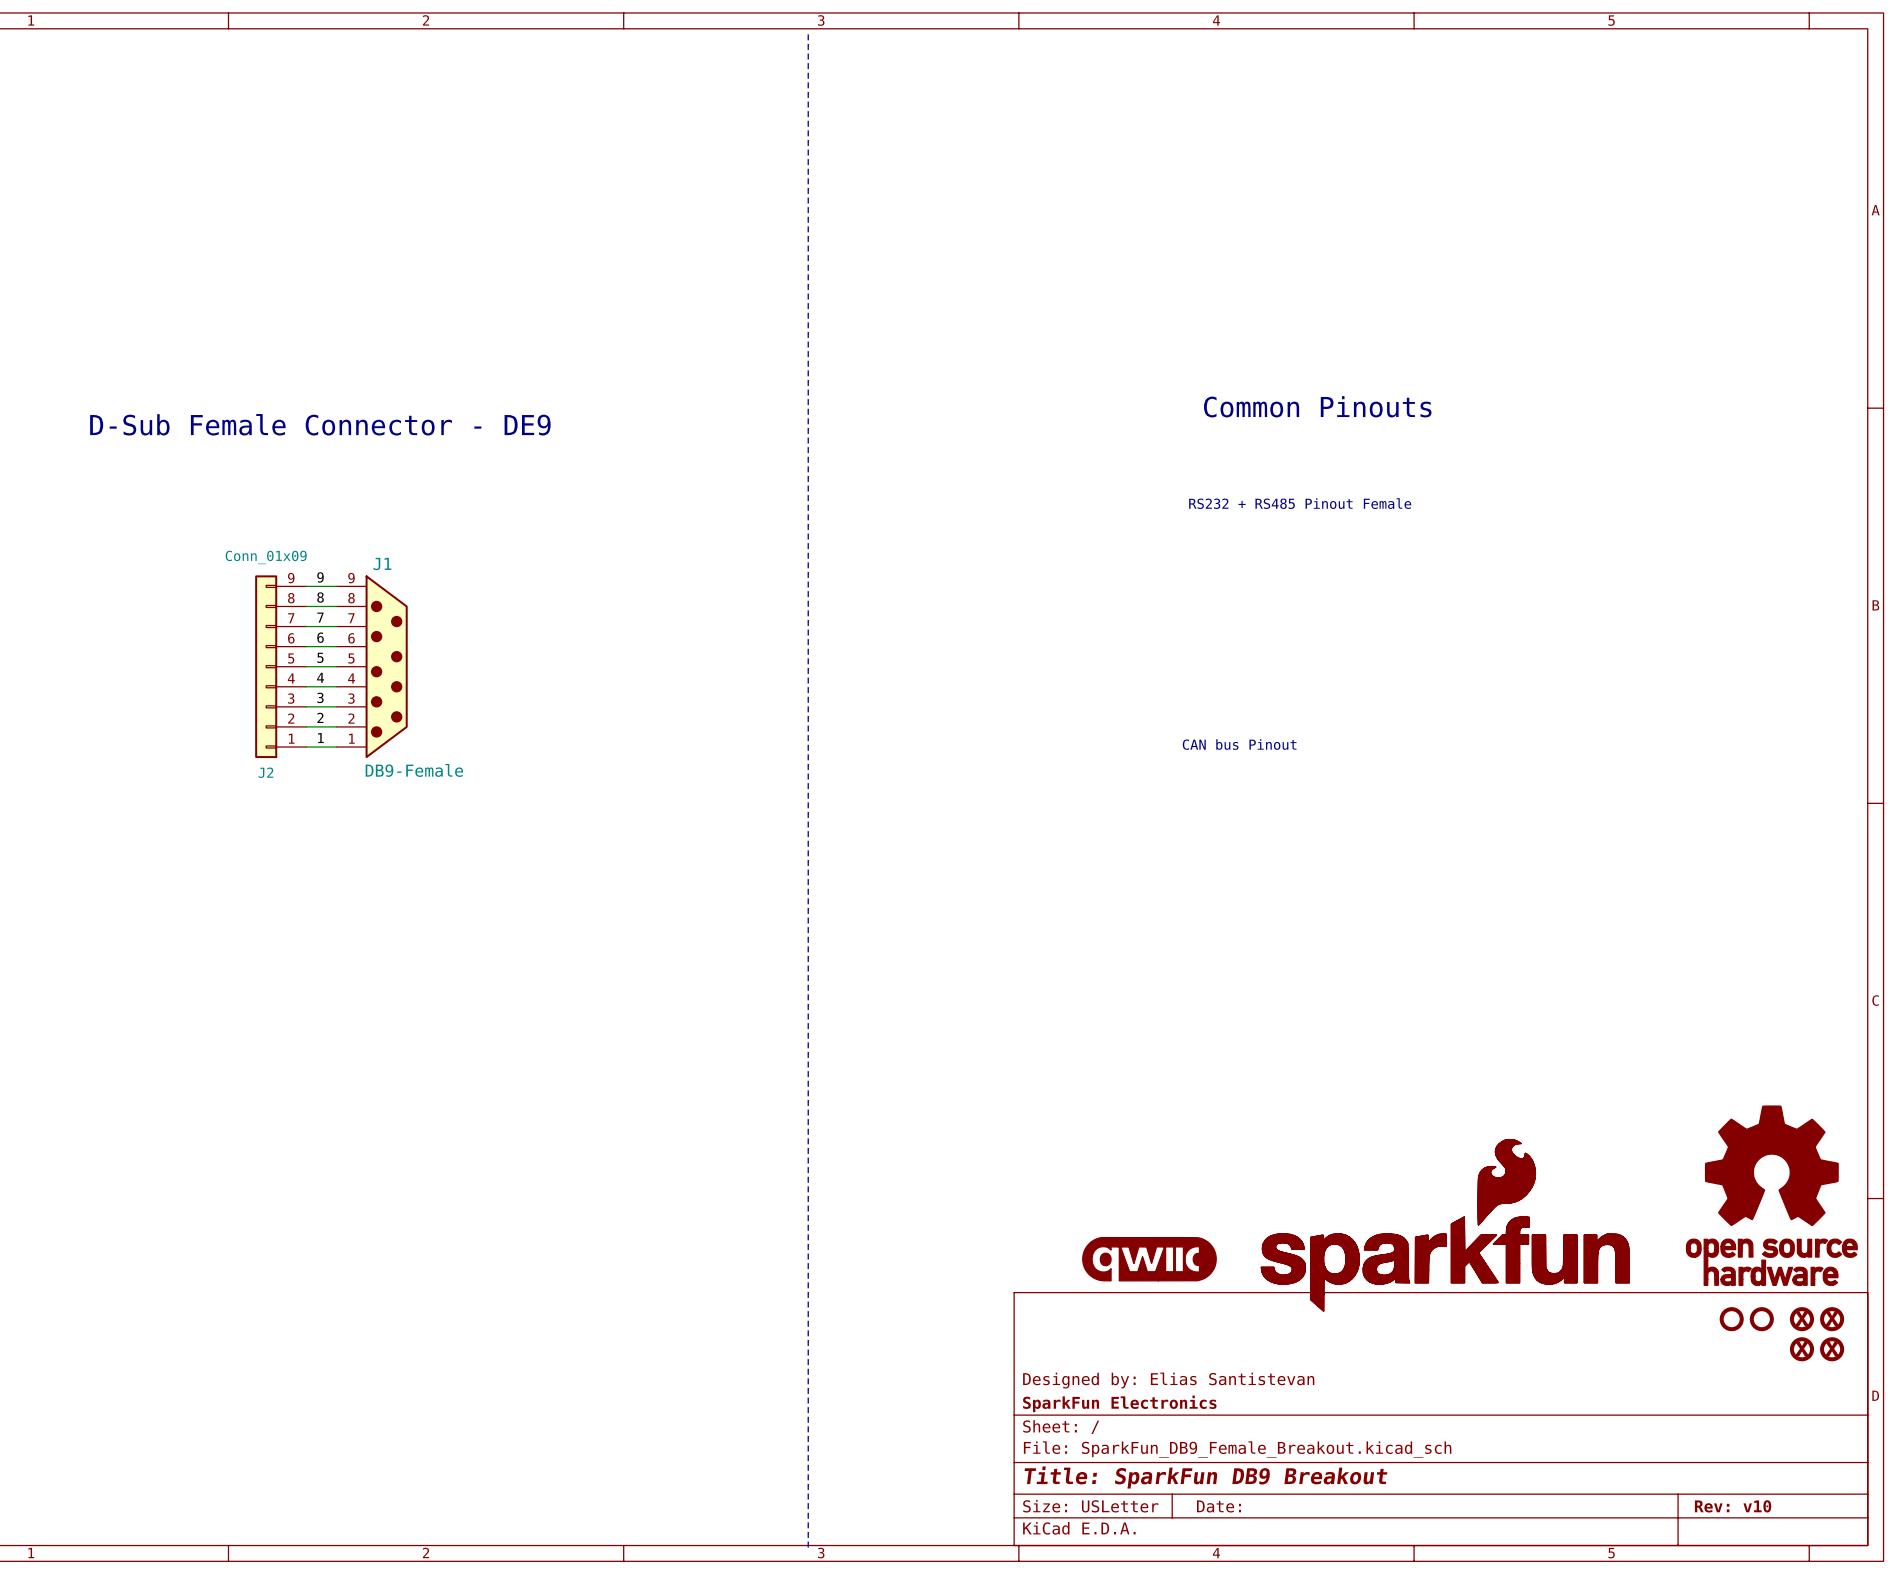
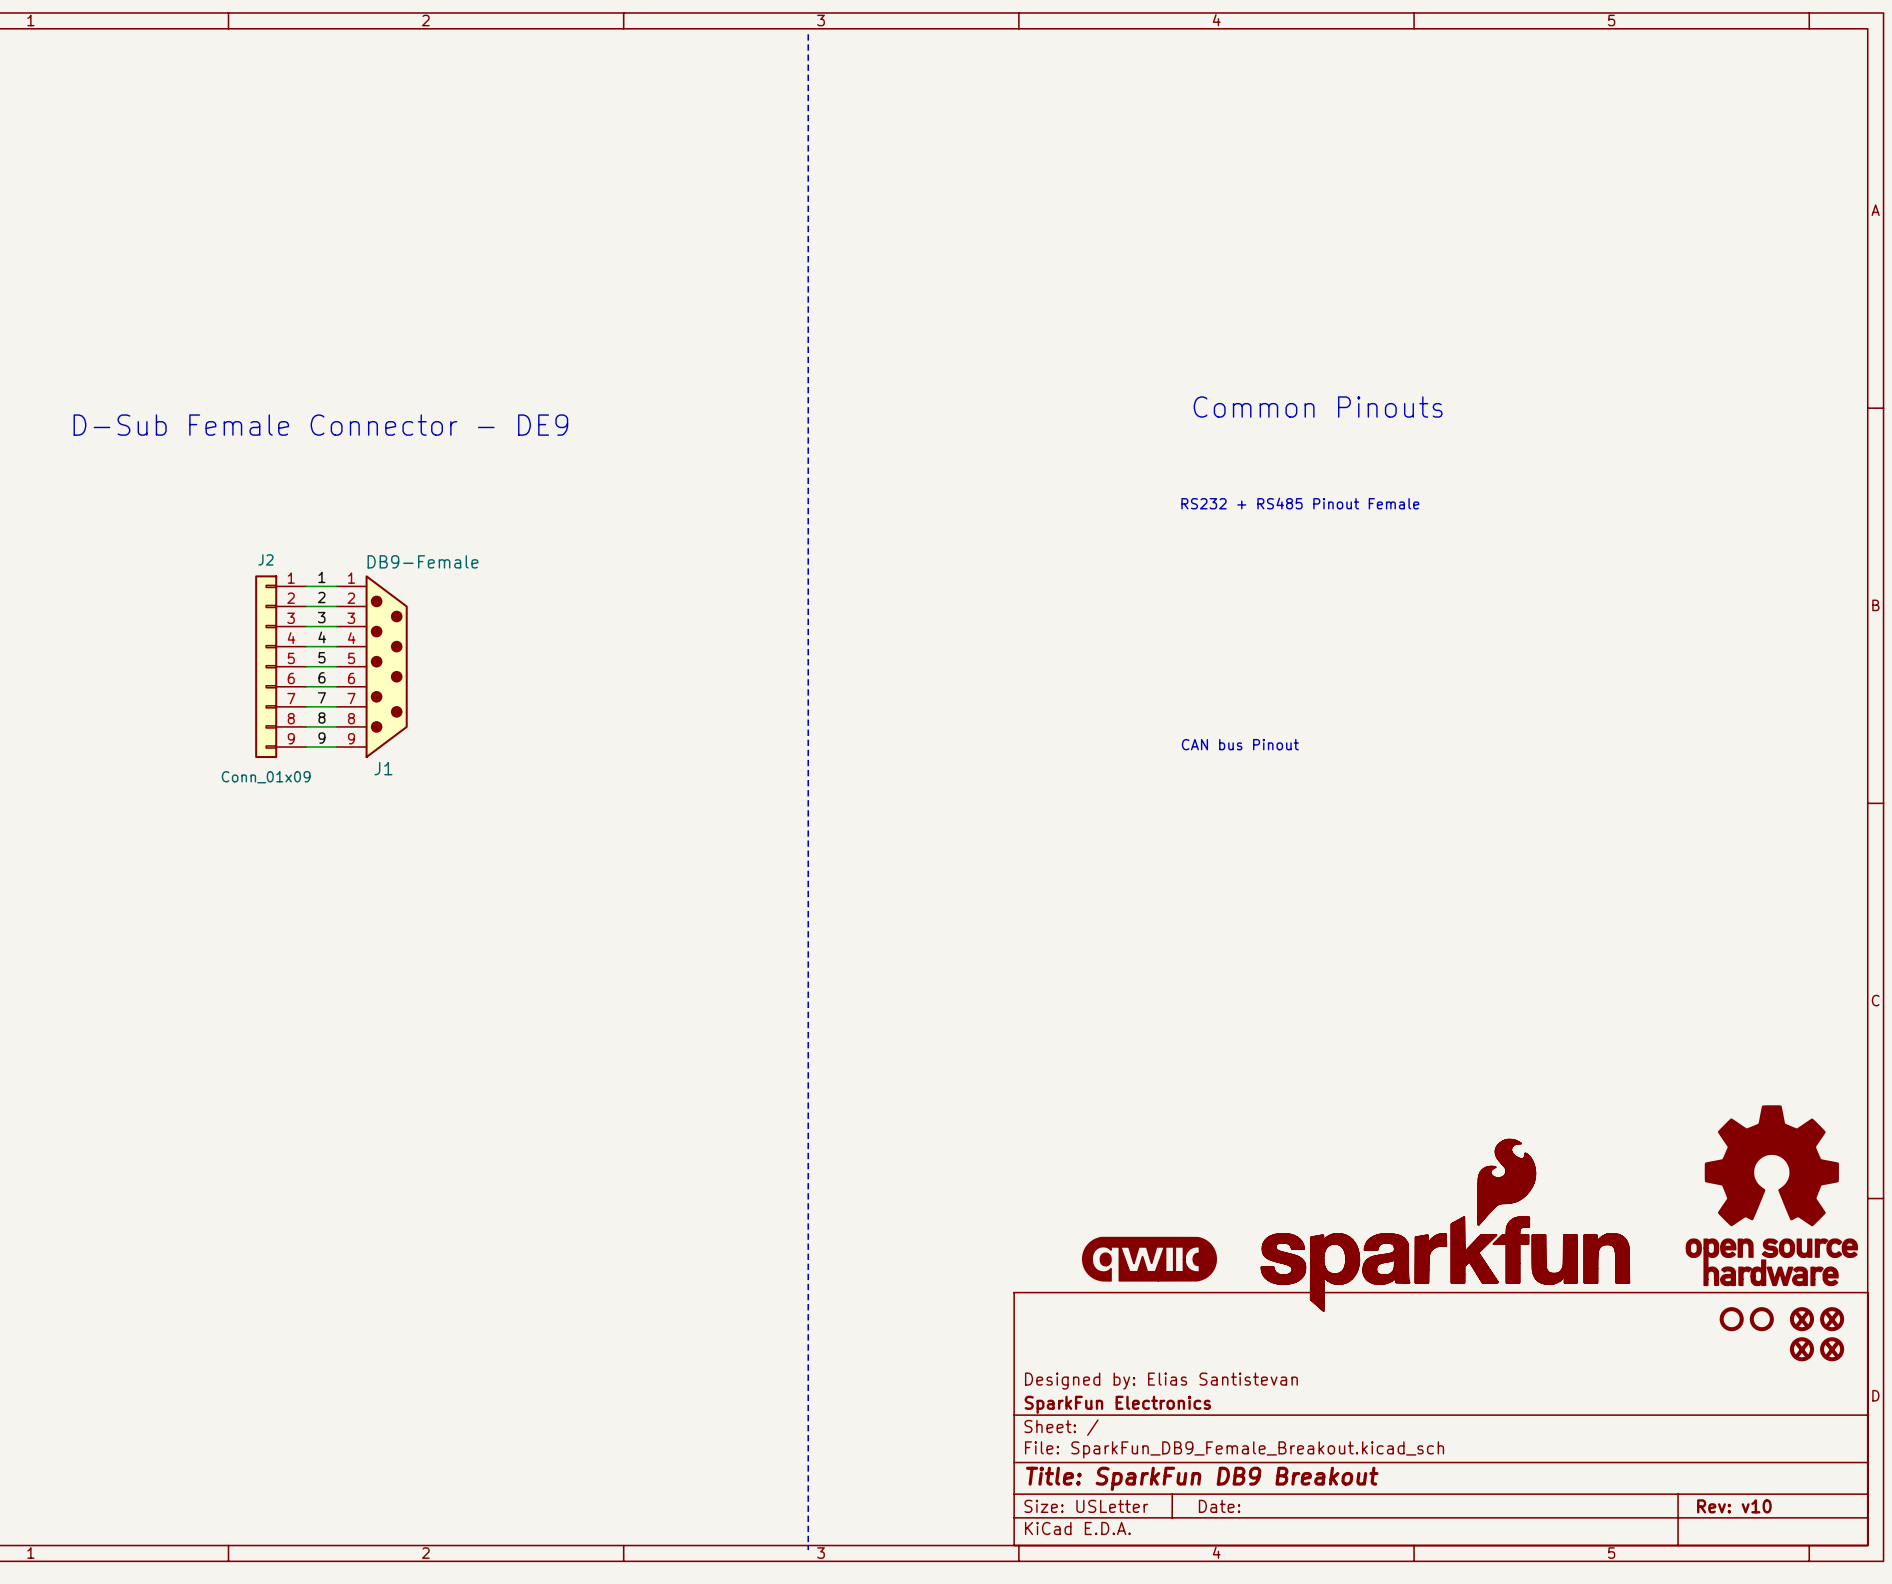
label: 9 (320, 577) -> 1 (321, 577)
label: 8 (320, 597) -> 2 (321, 597)
label: 7 (320, 617) -> 3 (321, 617)
label: 6 (320, 637) -> 4 (322, 637)
J2 flip: as is (266, 666) -> up-down (266, 666)
J1 flip: as is (386, 666) -> up-down (386, 666)
label: 4 (320, 677) -> 6 (321, 677)
label: 3 (320, 697) -> 7 (321, 697)
label: 2 (320, 717) -> 8 (321, 717)
label: 1 (320, 738) -> 9 (321, 738)

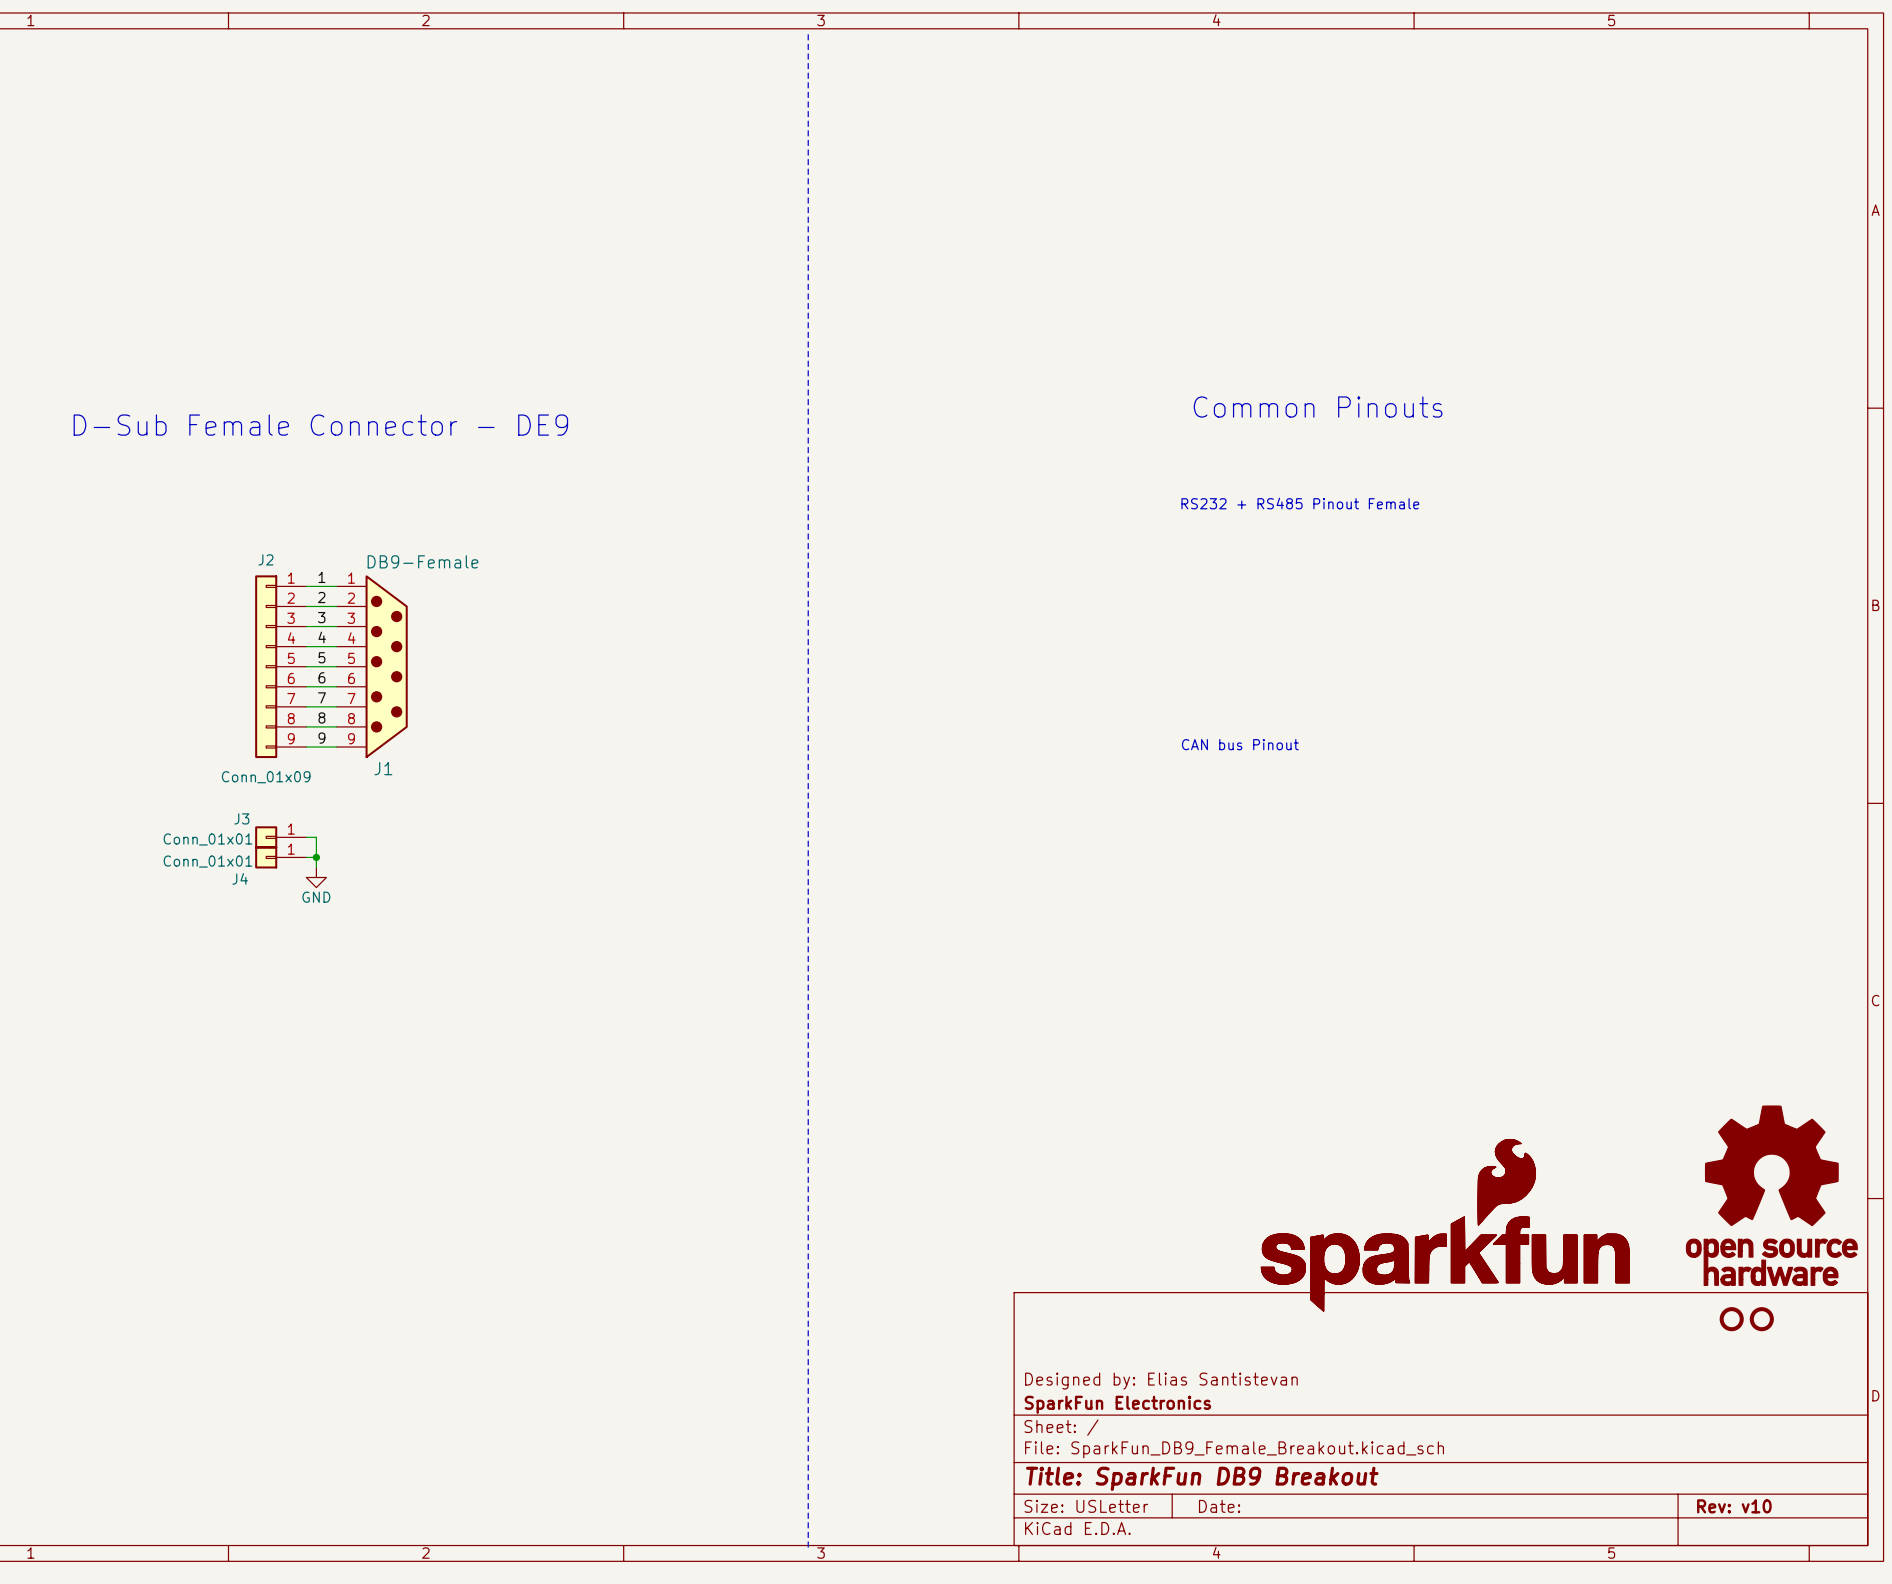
J3: none -> Conn_01x01 (280, 837)
wire: none -> (306, 837) (316, 837) (316, 867)
J4: none -> Conn_01x01 (280, 857)
wire: none -> (306, 857) (316, 857)
junction: none -> (316, 857)
power symbol: none -> GND (316, 877)
part: (1149, 1259) -> none
part: (1801, 1319) -> none
part: (1832, 1319) -> none
part: (1801, 1349) -> none
part: (1832, 1349) -> none

